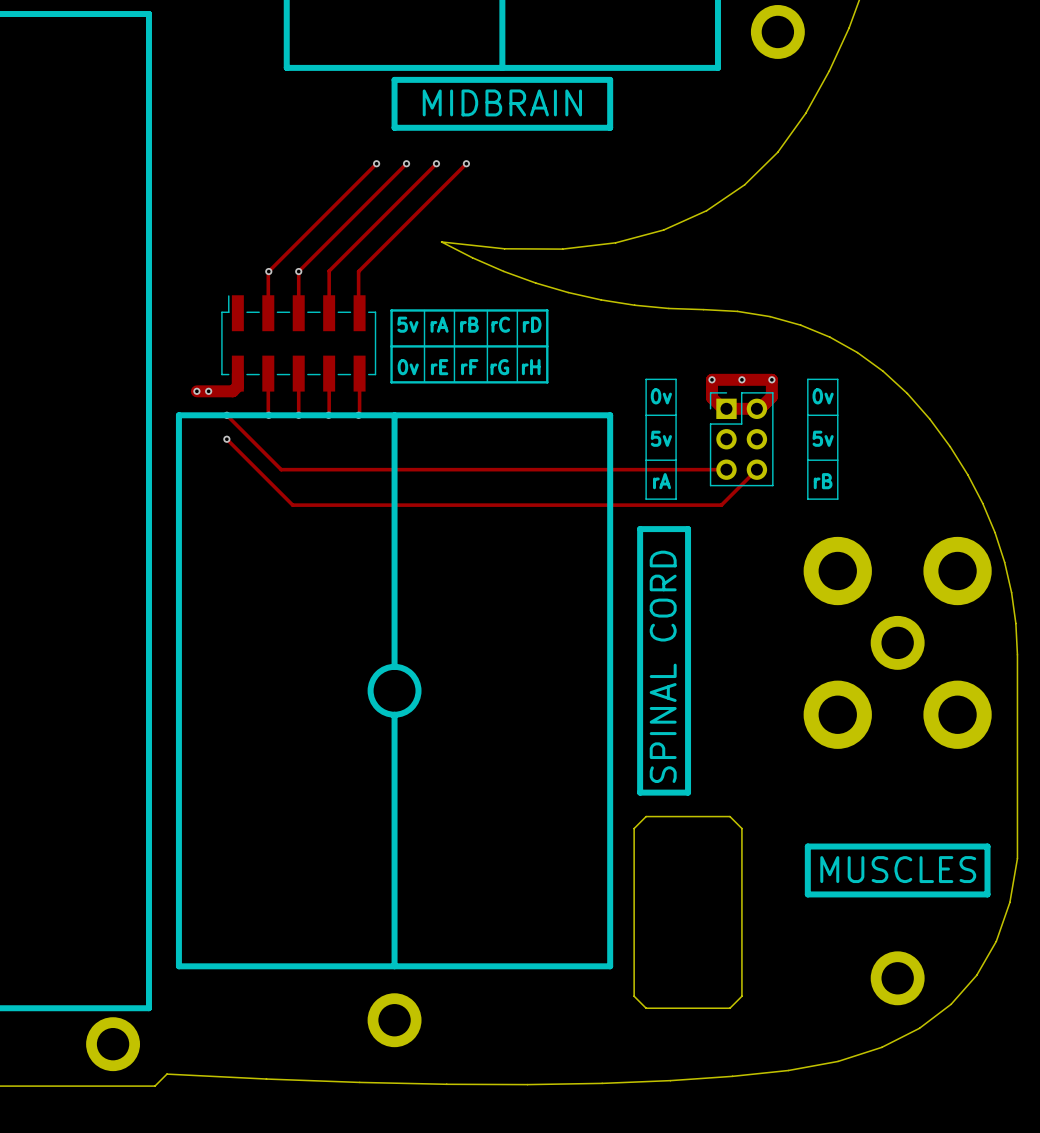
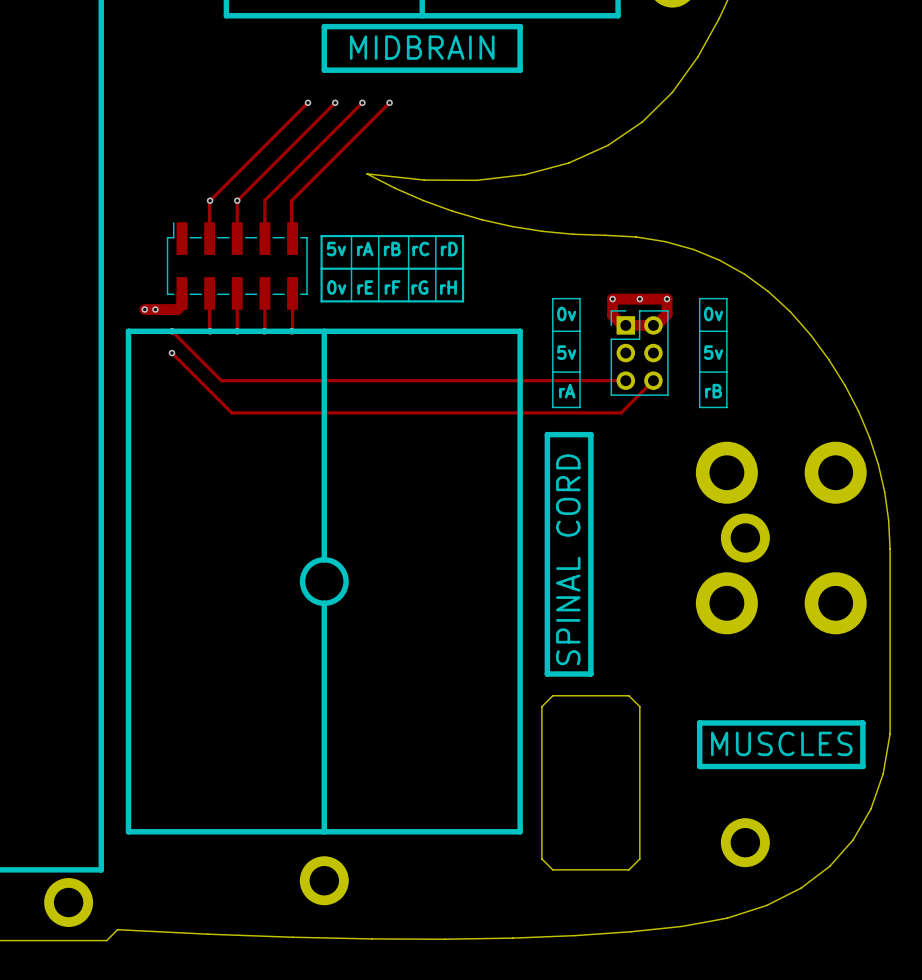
part position: (897, 642) -> (745, 538)
part position: (897, 978) -> (745, 842)

